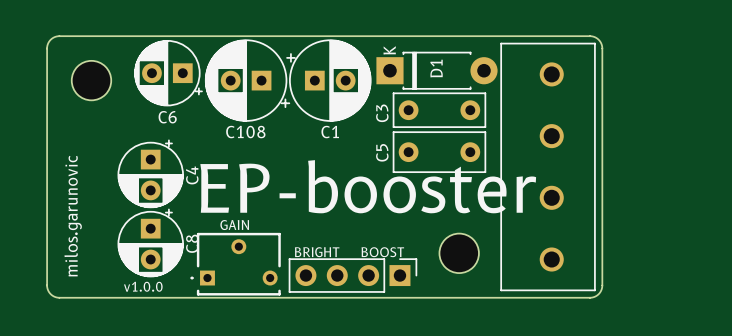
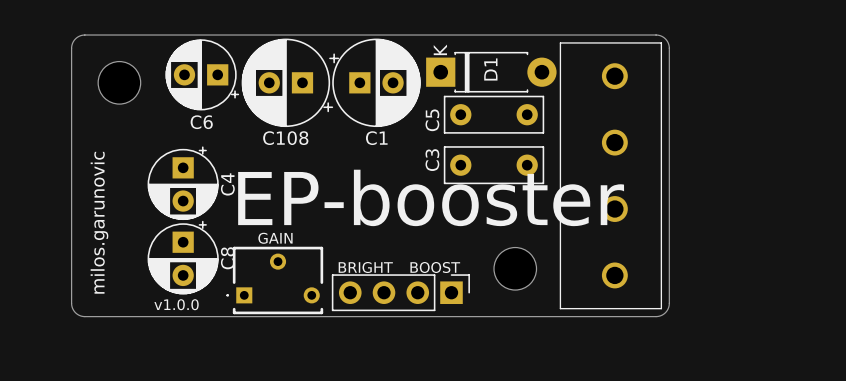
C3 name position: C3 (382, 113) -> C3 (432, 160)
C5 footprint: [392, 131, 487, 173] -> [443, 146, 545, 185]
C5 name position: C5 (382, 152) -> C5 (432, 120)

